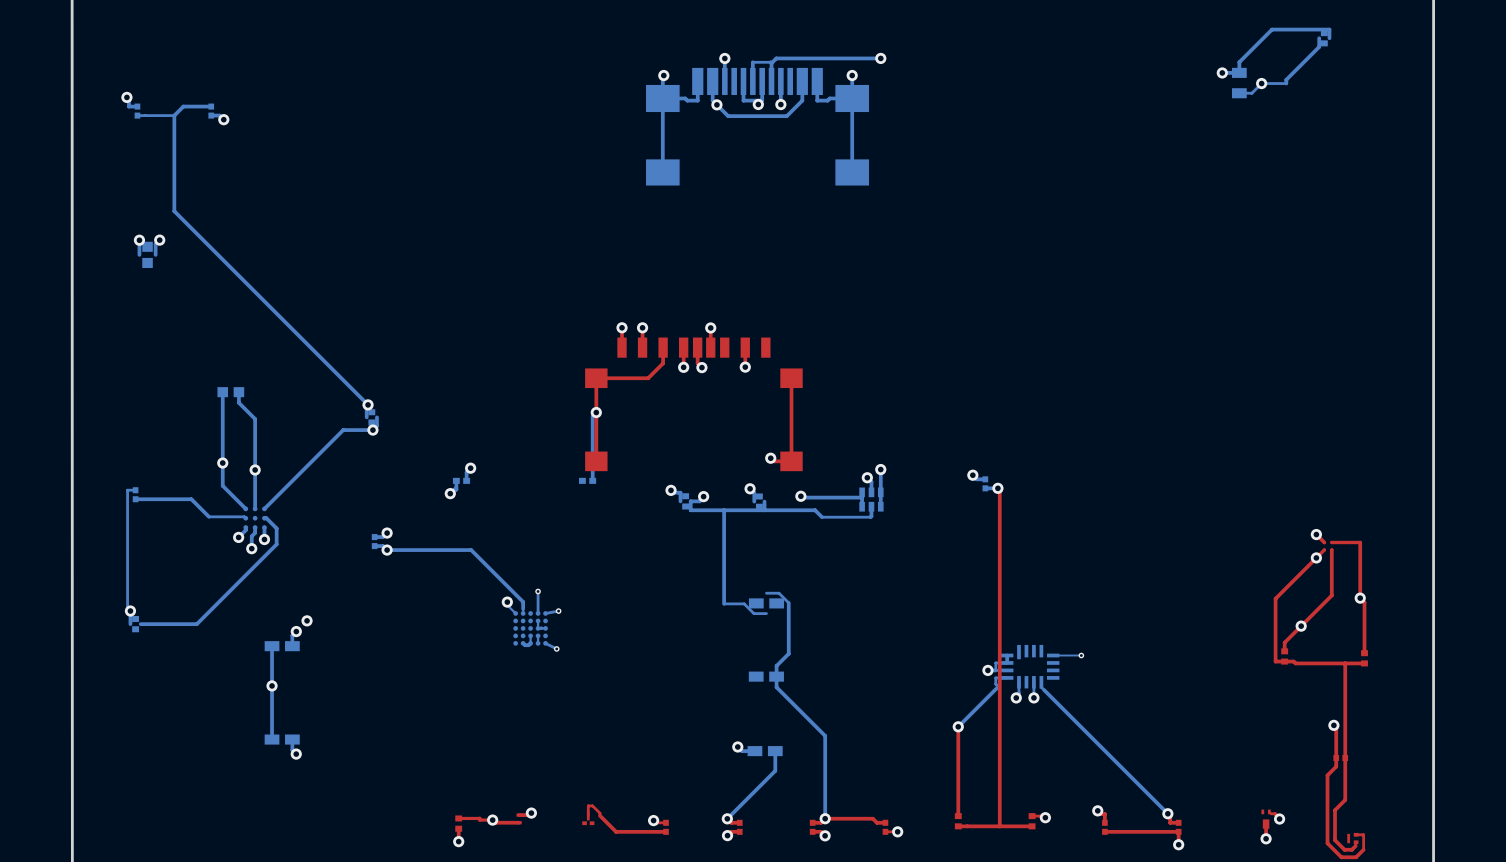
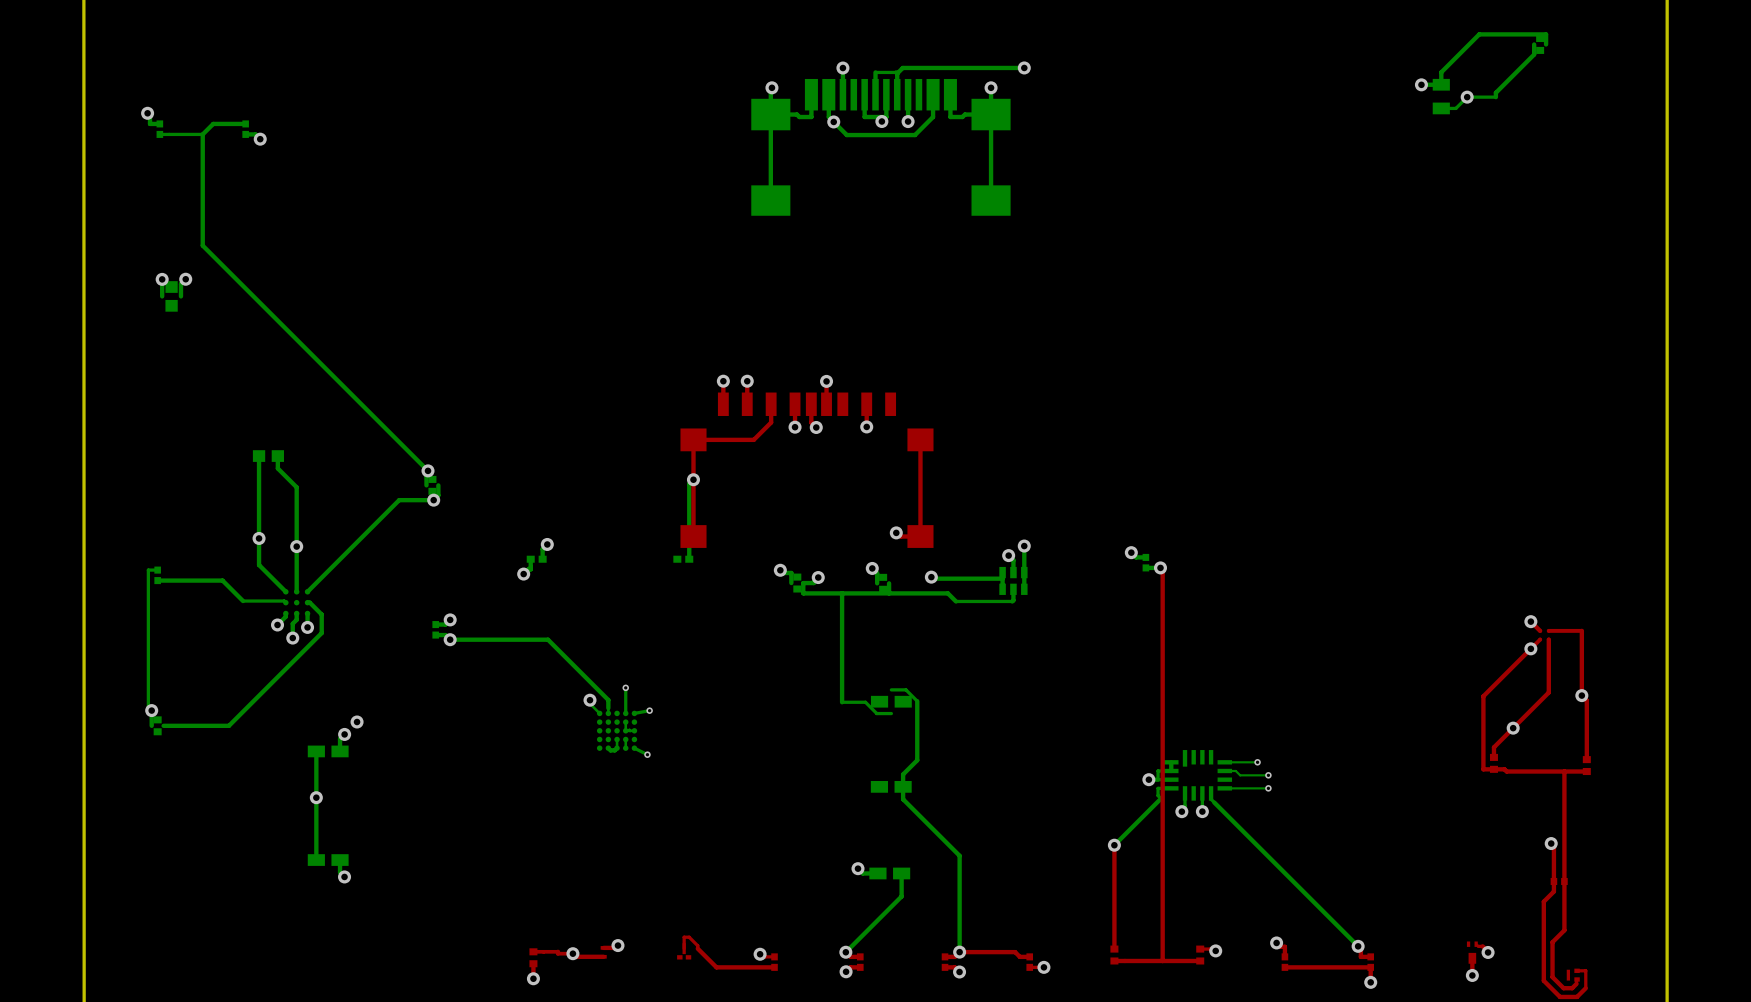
bottom track: none -> (1224, 770) (1235, 770) (1240, 775) (1268, 775)
via: none -> (1268, 775)
bottom track: none -> (1224, 788) (1268, 788)
via: none -> (1268, 788)

